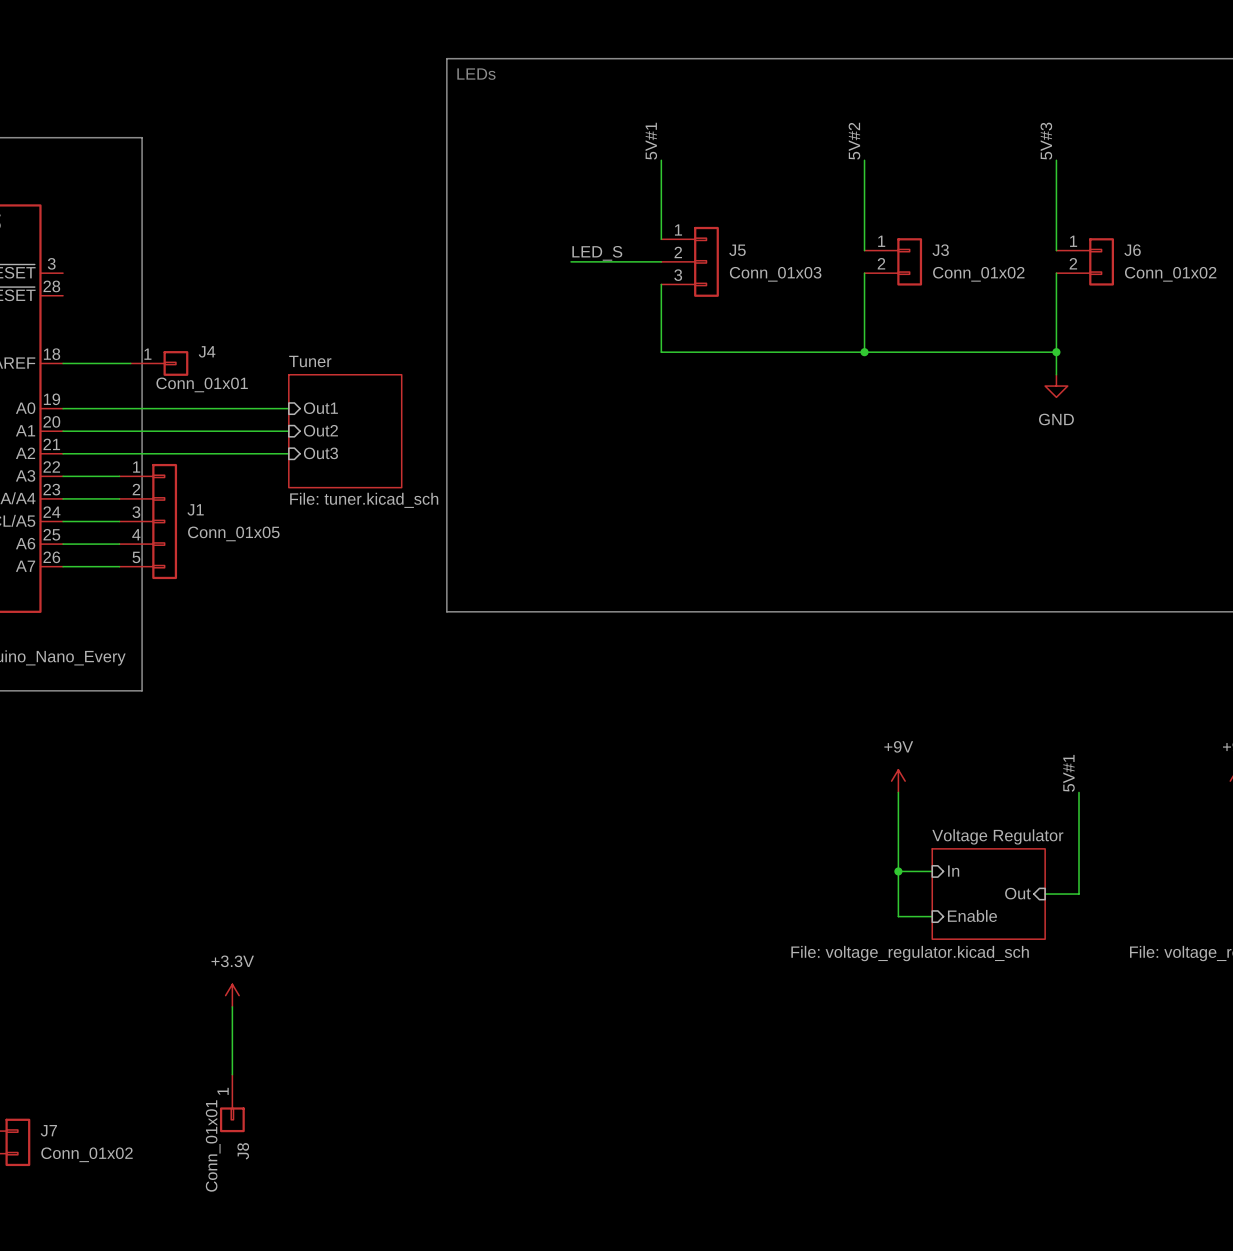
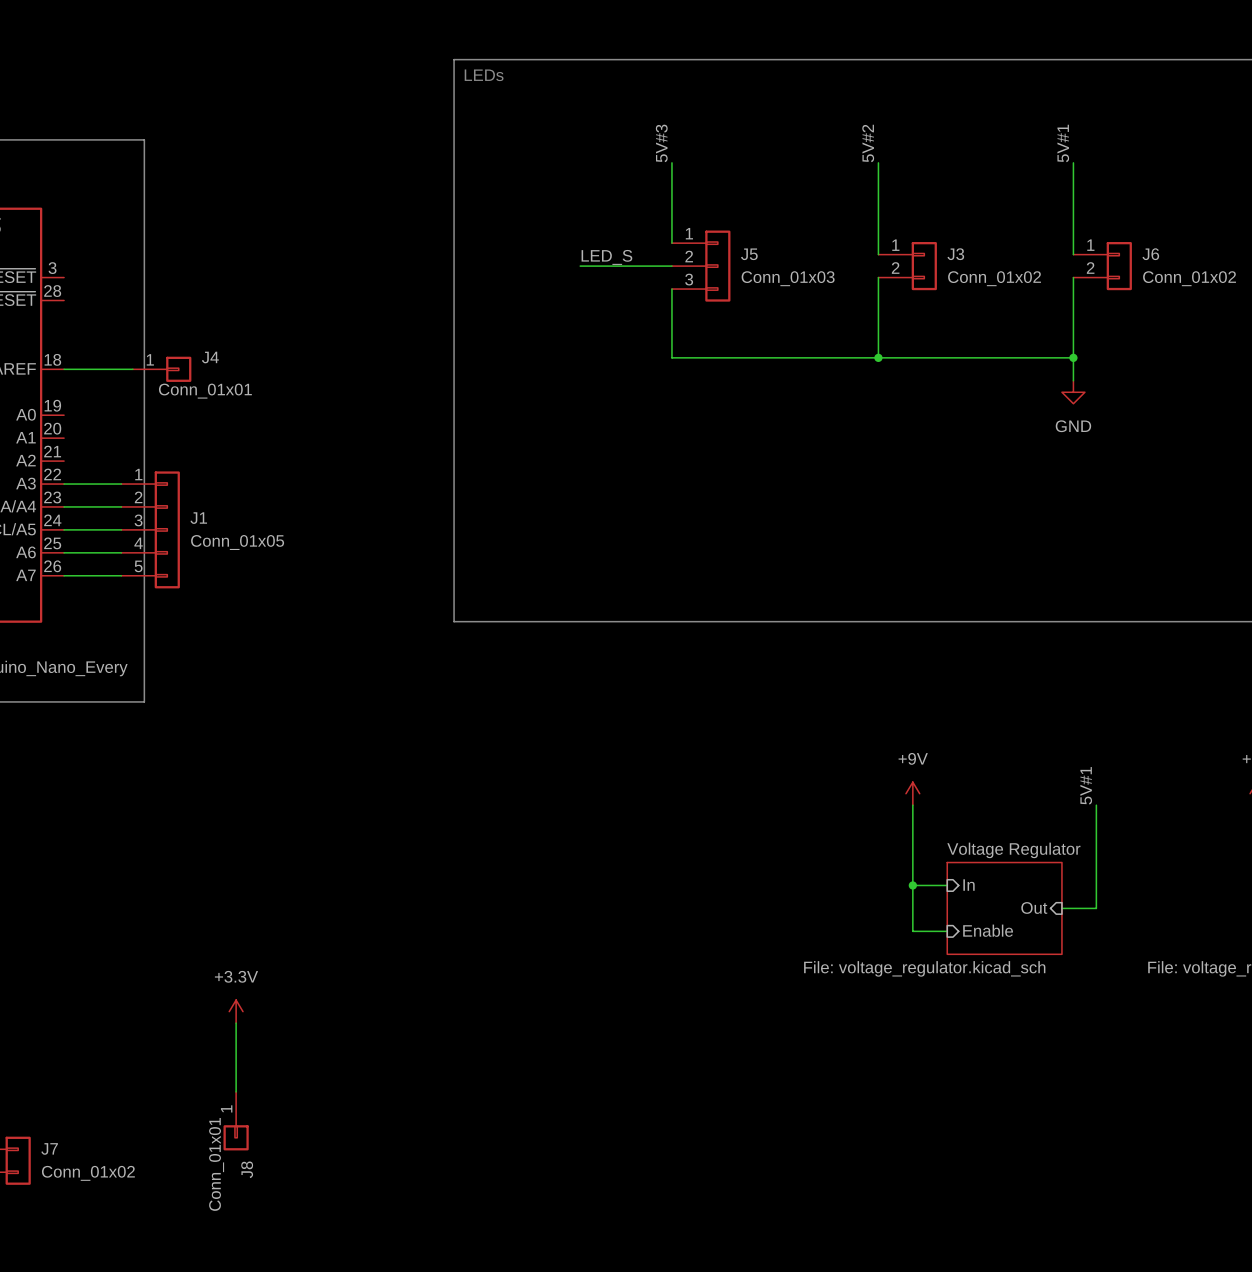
label: 5V#1 (651, 141) -> 5V#3 (661, 143)
label: 5V#3 (1046, 141) -> 5V#1 (1063, 143)
wire: (63, 408) (288, 408) -> none
sheet pin: Out1 (320, 408) -> none
sheet pin: Out2 (320, 430) -> none
wire: (63, 431) (288, 431) -> none
sheet Tuner: File: tuner.kicad_sch (345, 431) -> none
wire: (63, 453) (288, 453) -> none
sheet pin: Out3 (320, 453) -> none

